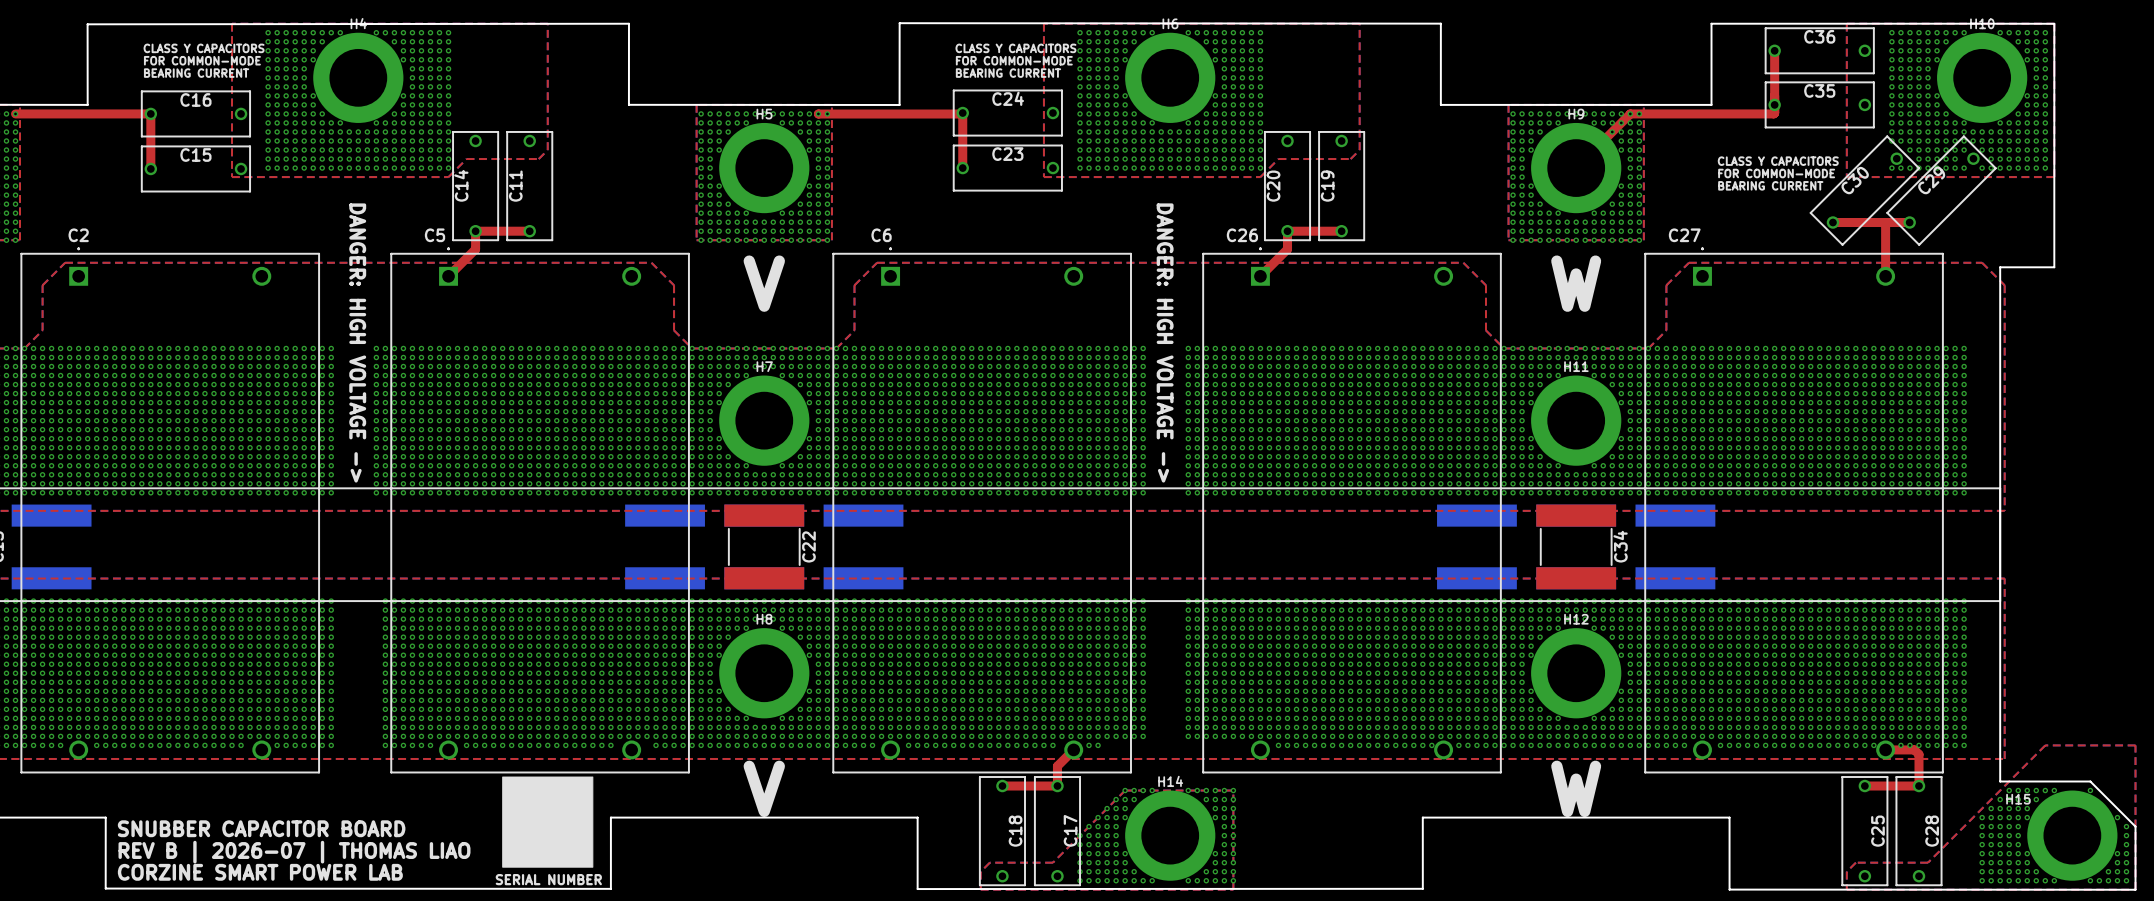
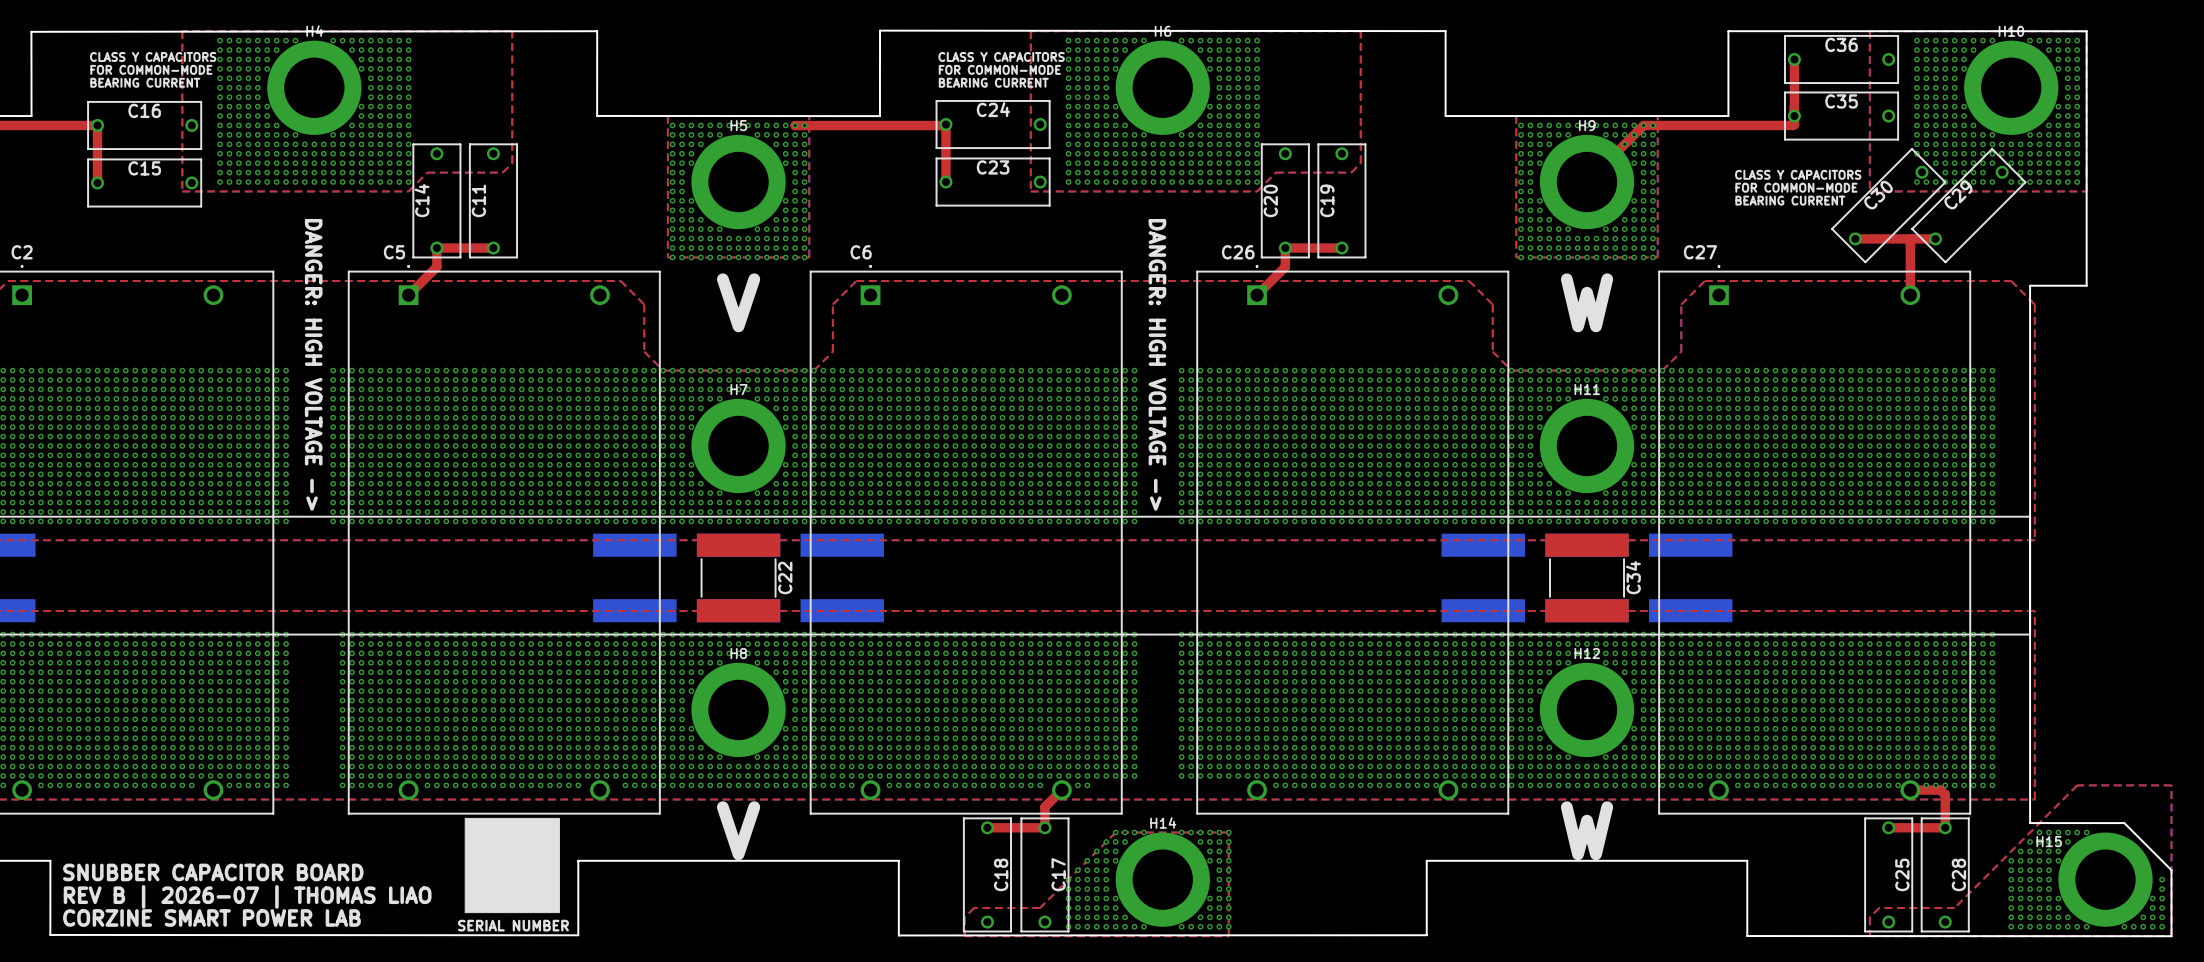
via: (2090, 790) -> none
via: (2117, 817) -> none
via: (2126, 826) -> none

